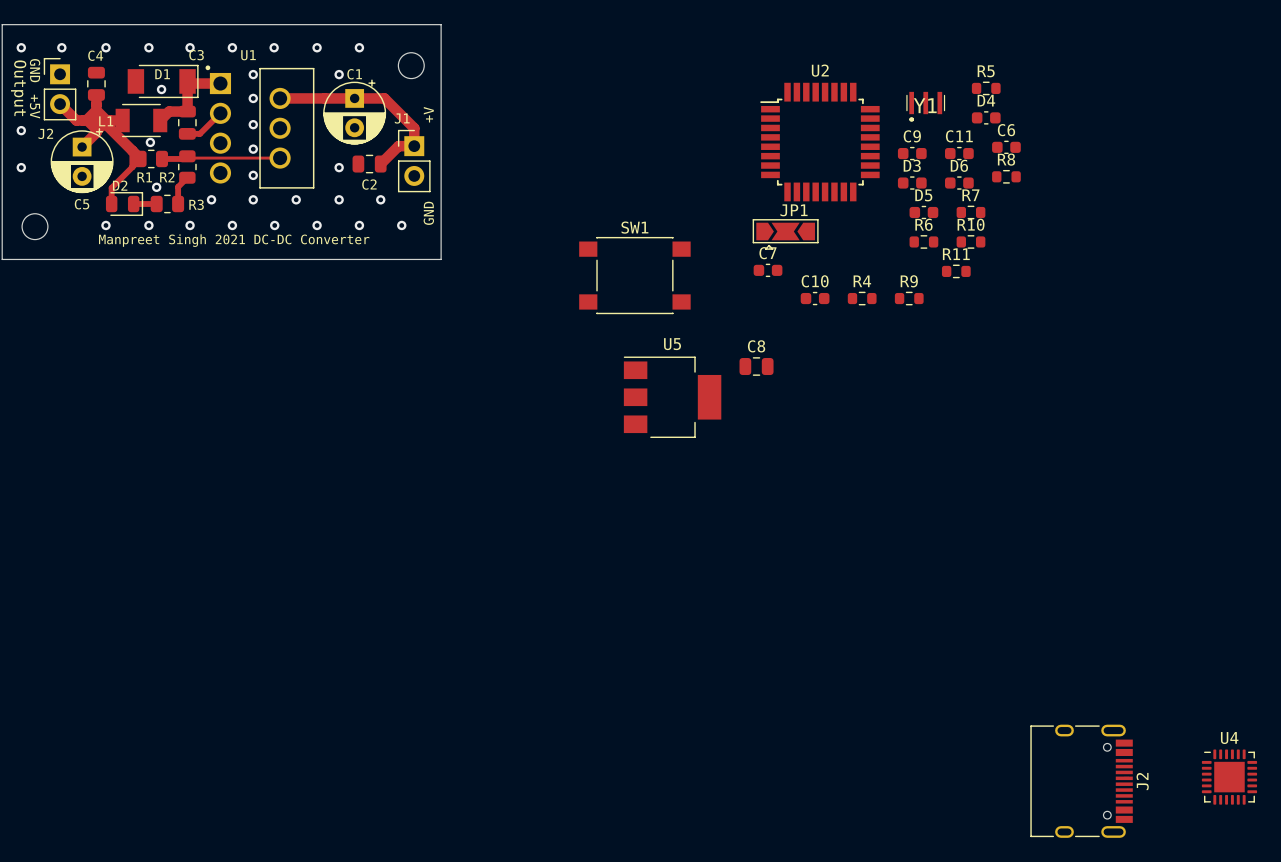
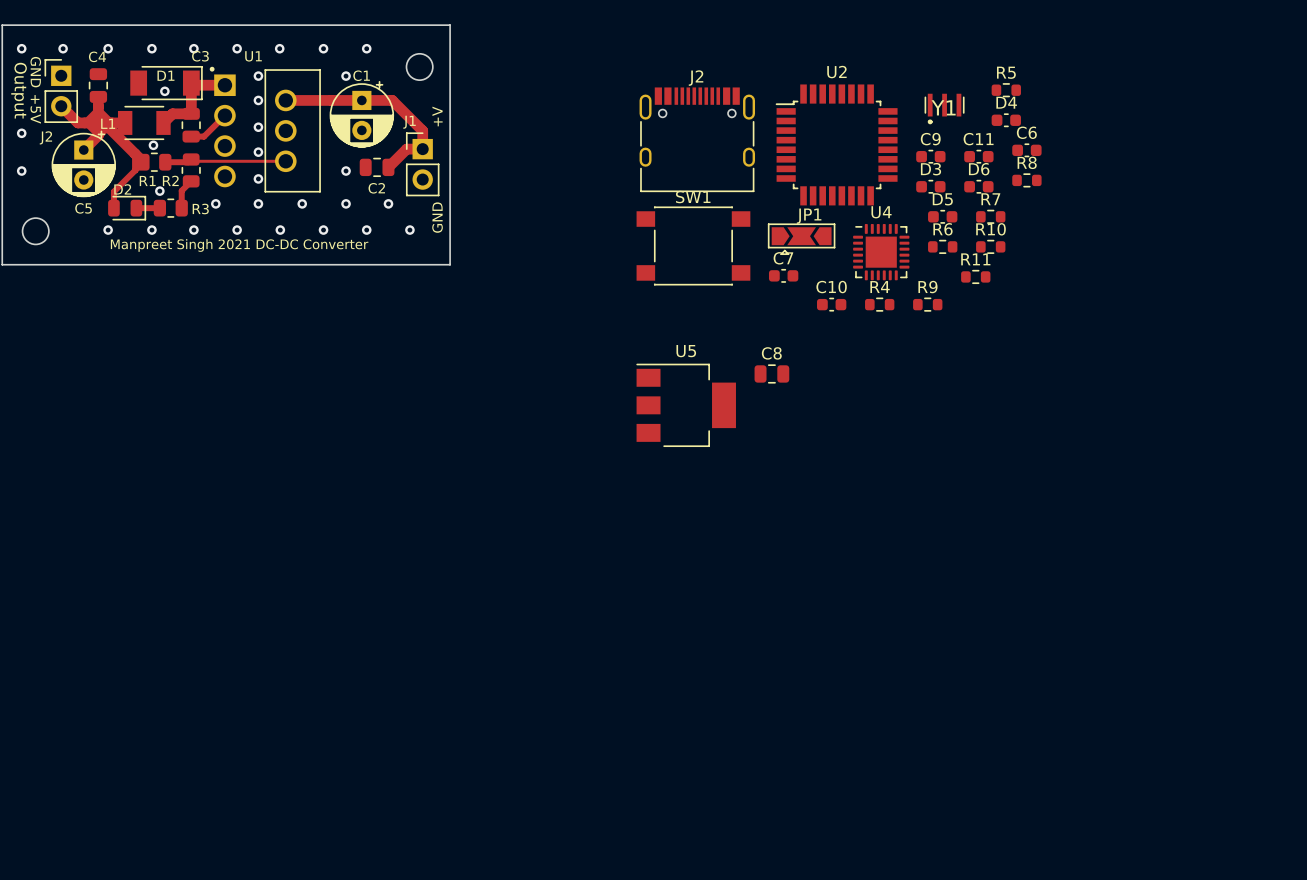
J2: none -> (697, 139)
SW1 position: (634, 275) -> (693, 245)
U4 position: (1229, 777) -> (881, 252)
J2: (1081, 781) -> none

